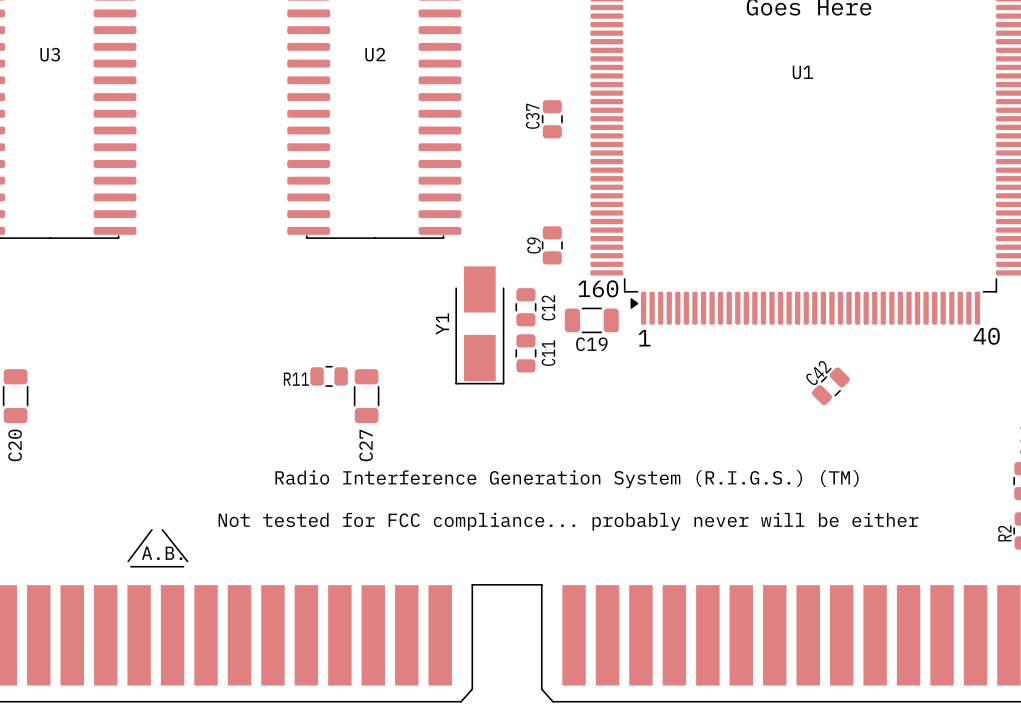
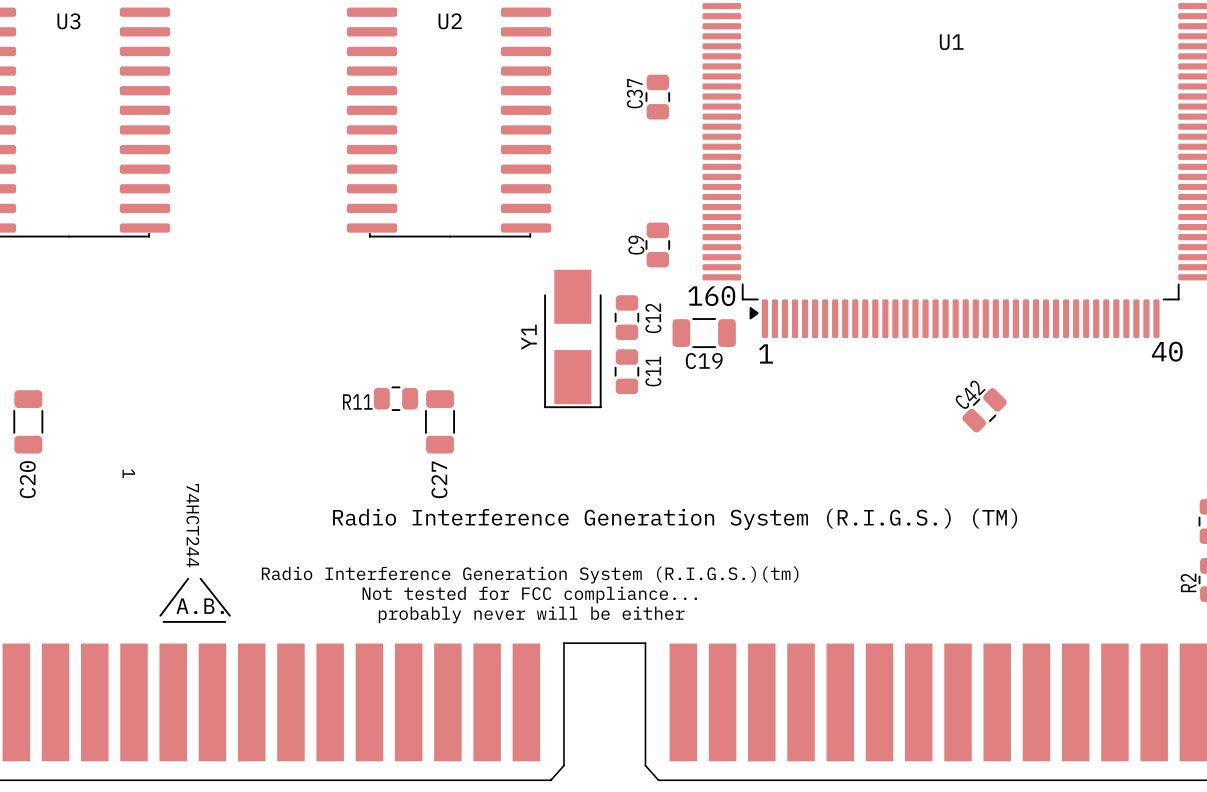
text: none -> 1 (128, 473)
text: none -> 74HCT244 (192, 525)
text: Not tested for FCC compliance... probably never will be either (568, 521) -> Not tested for FCC compliance... (529, 594)
text: none -> Radio Interference Generation System (R.I.G.S.)(tm) (530, 574)
text: none -> probably never will be either (531, 614)

